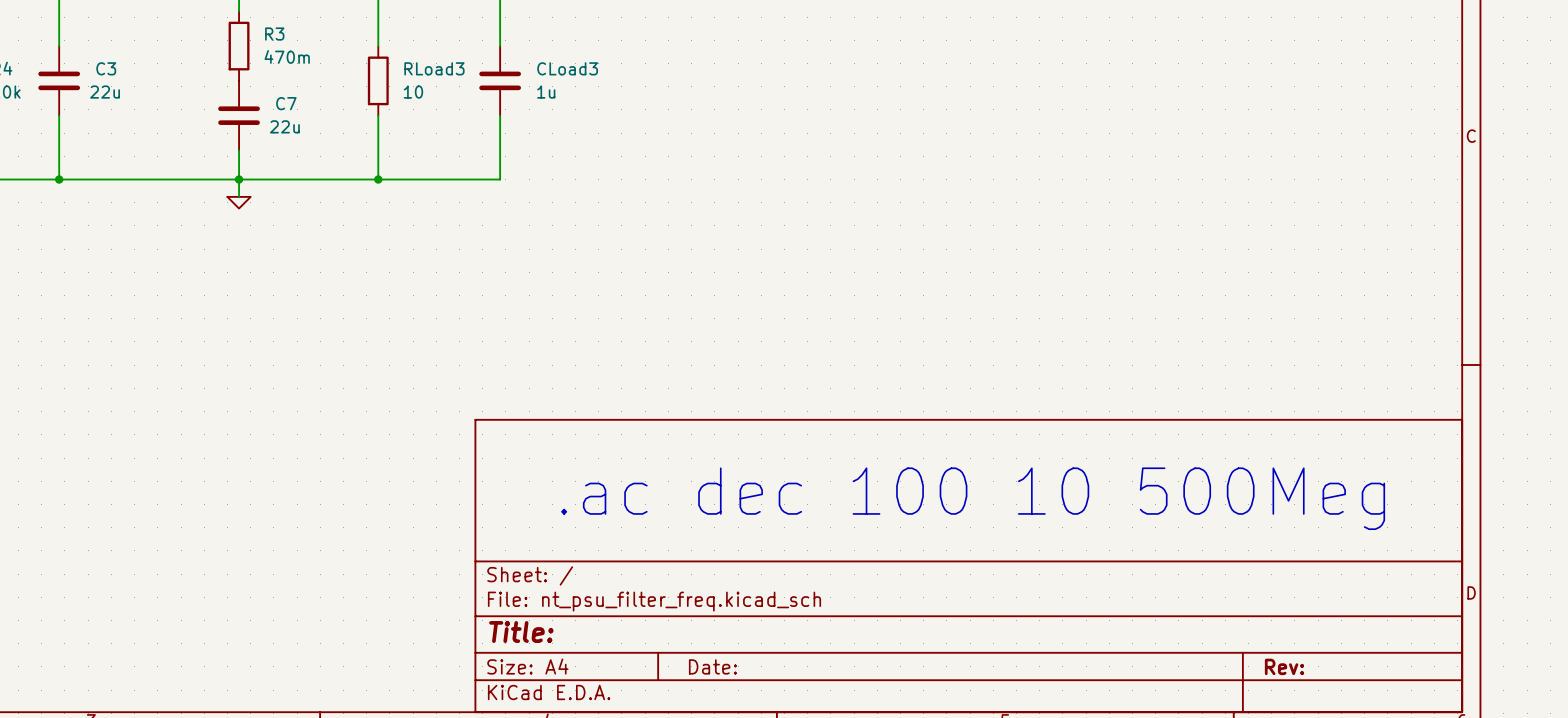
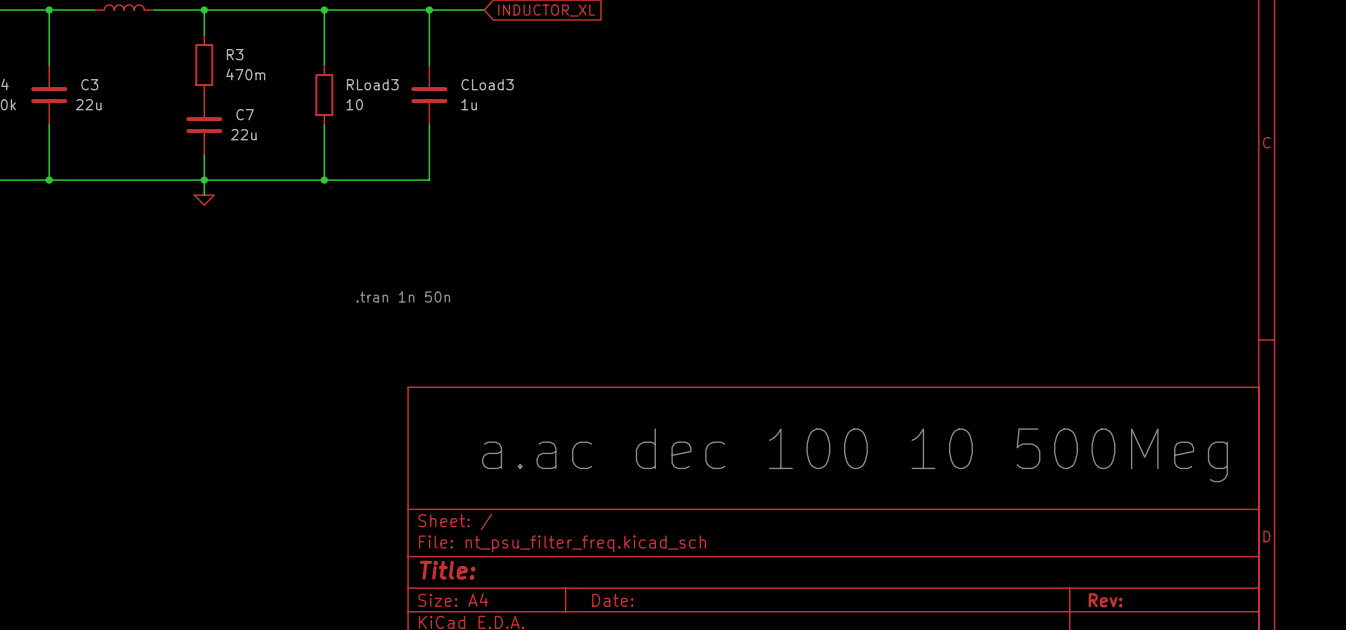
text: none -> .tran 1n 50n (403, 296)
text: .ac dec 100 10 500Meg (973, 498) -> a.ac dec 100 10 500Meg (854, 455)

